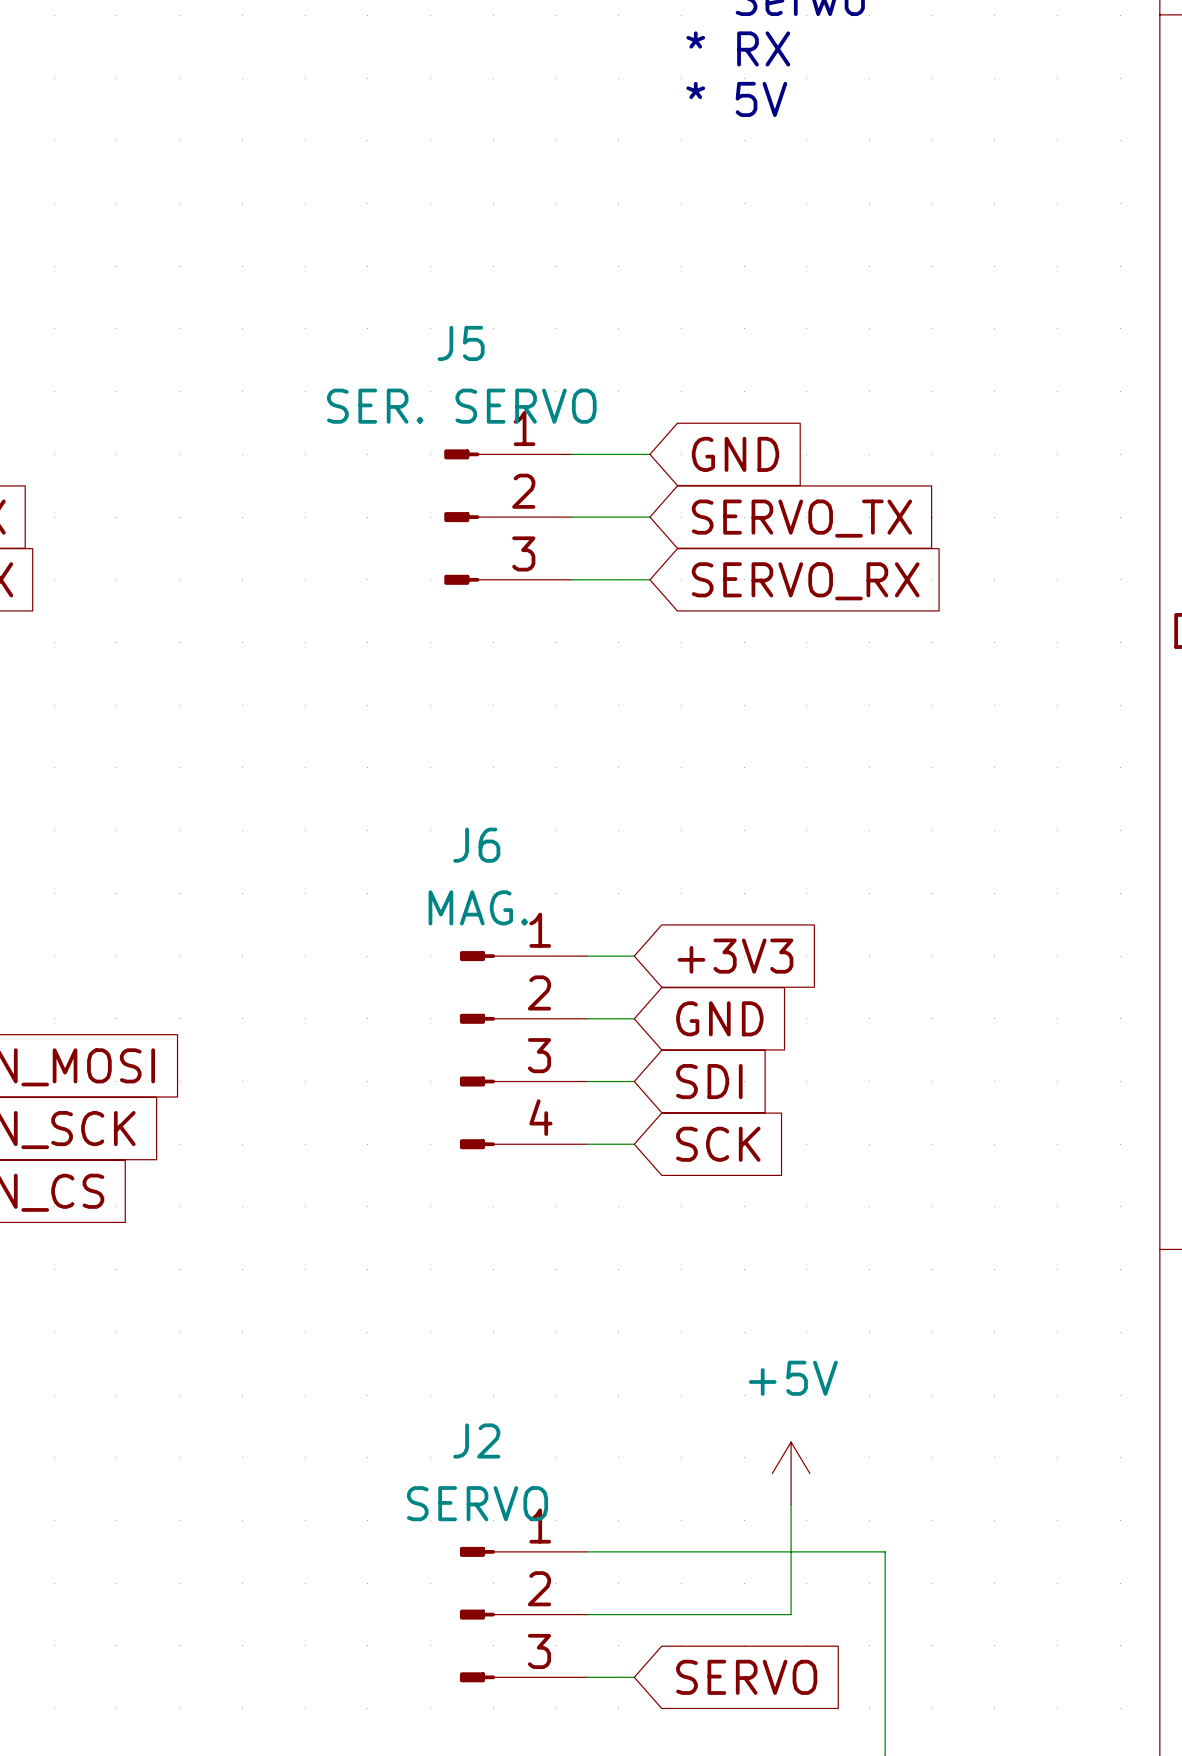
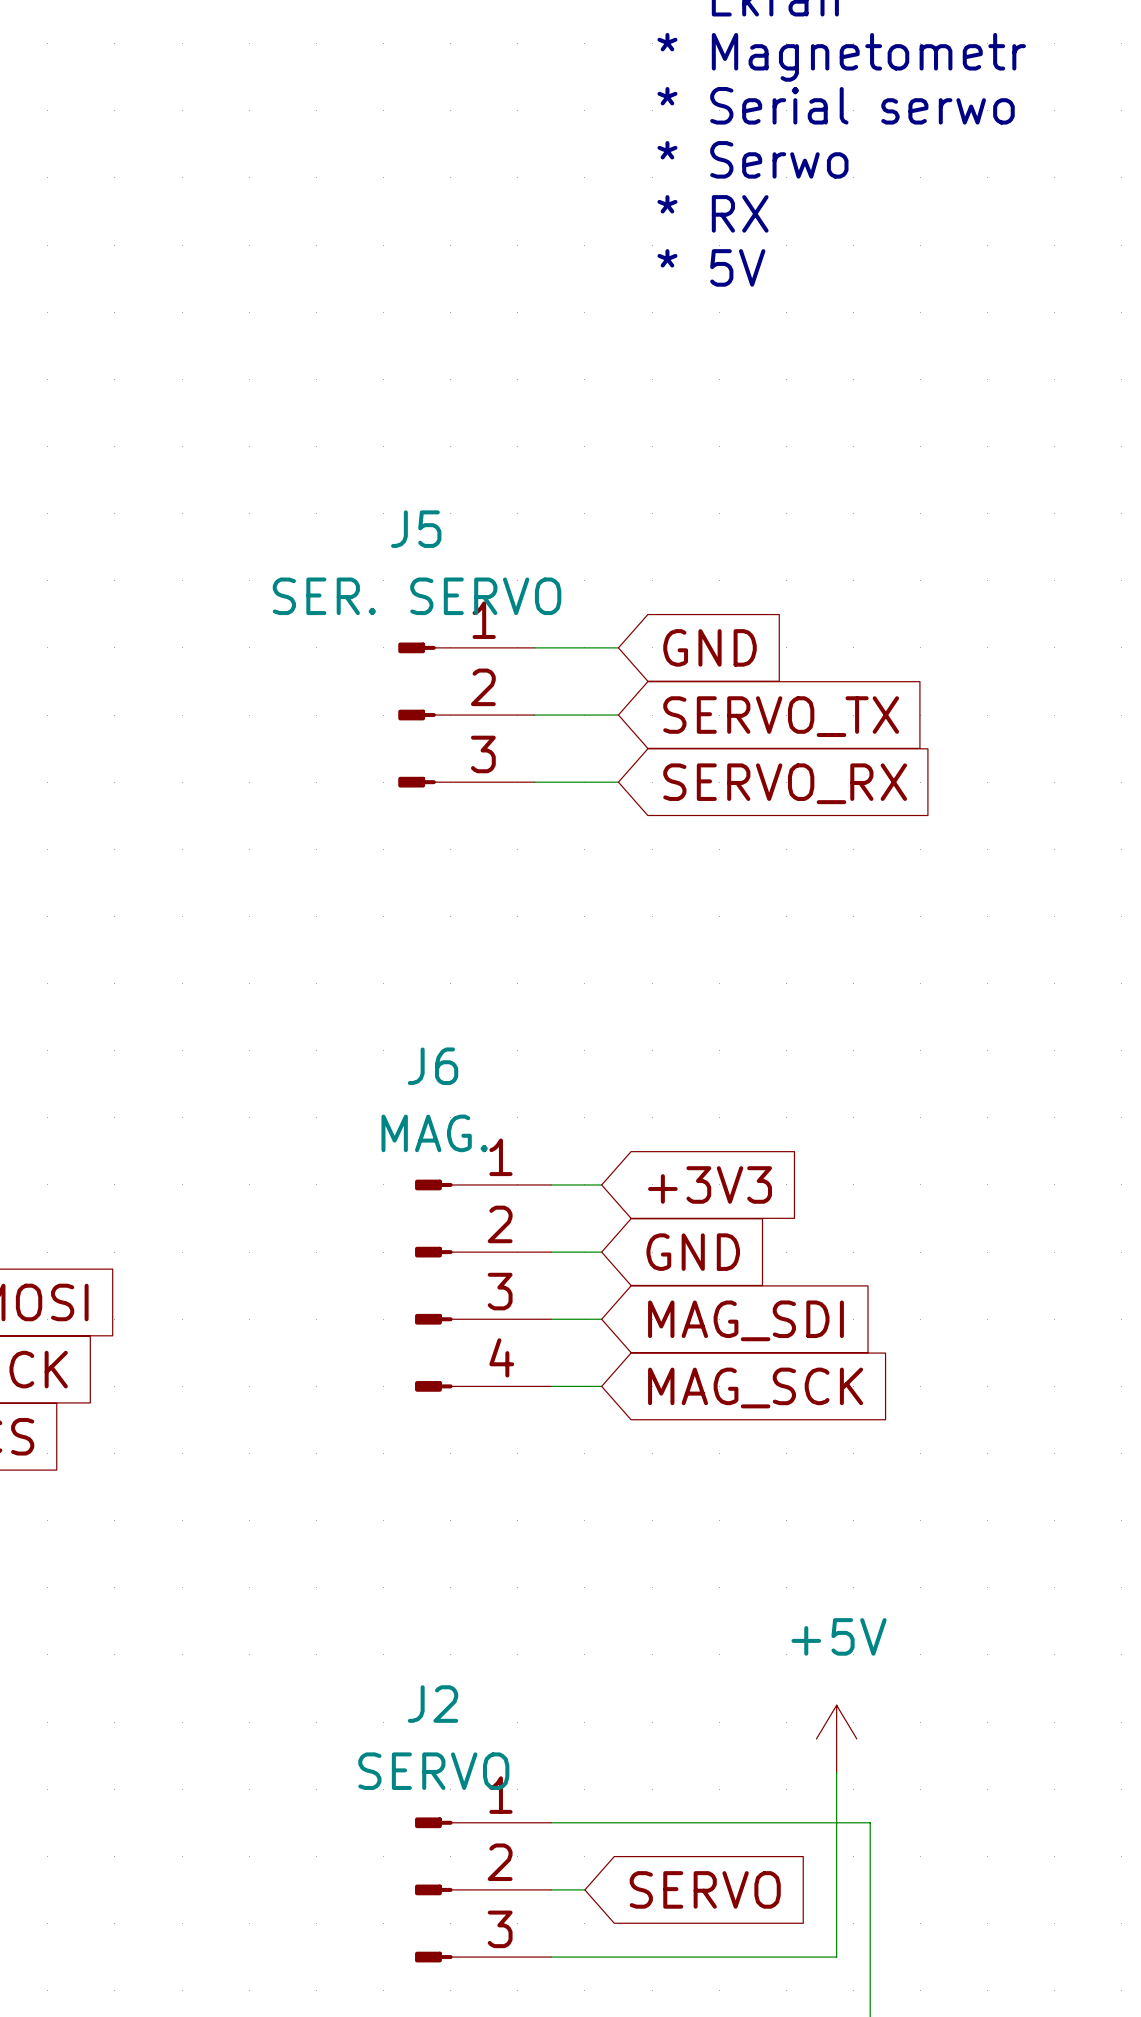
global label: SDI (709, 1081) -> MAG_SDI (745, 1320)
global label: SCK (718, 1144) -> MAG_SCK (755, 1387)
power symbol position: +5V (791, 1473) -> +5V (836, 1738)
wire: (791, 1504) (791, 1614) (618, 1614) -> none
wire: none -> (836, 1772) (836, 1957) (601, 1957)
global label position: SERVO (746, 1677) -> SERVO (705, 1889)

